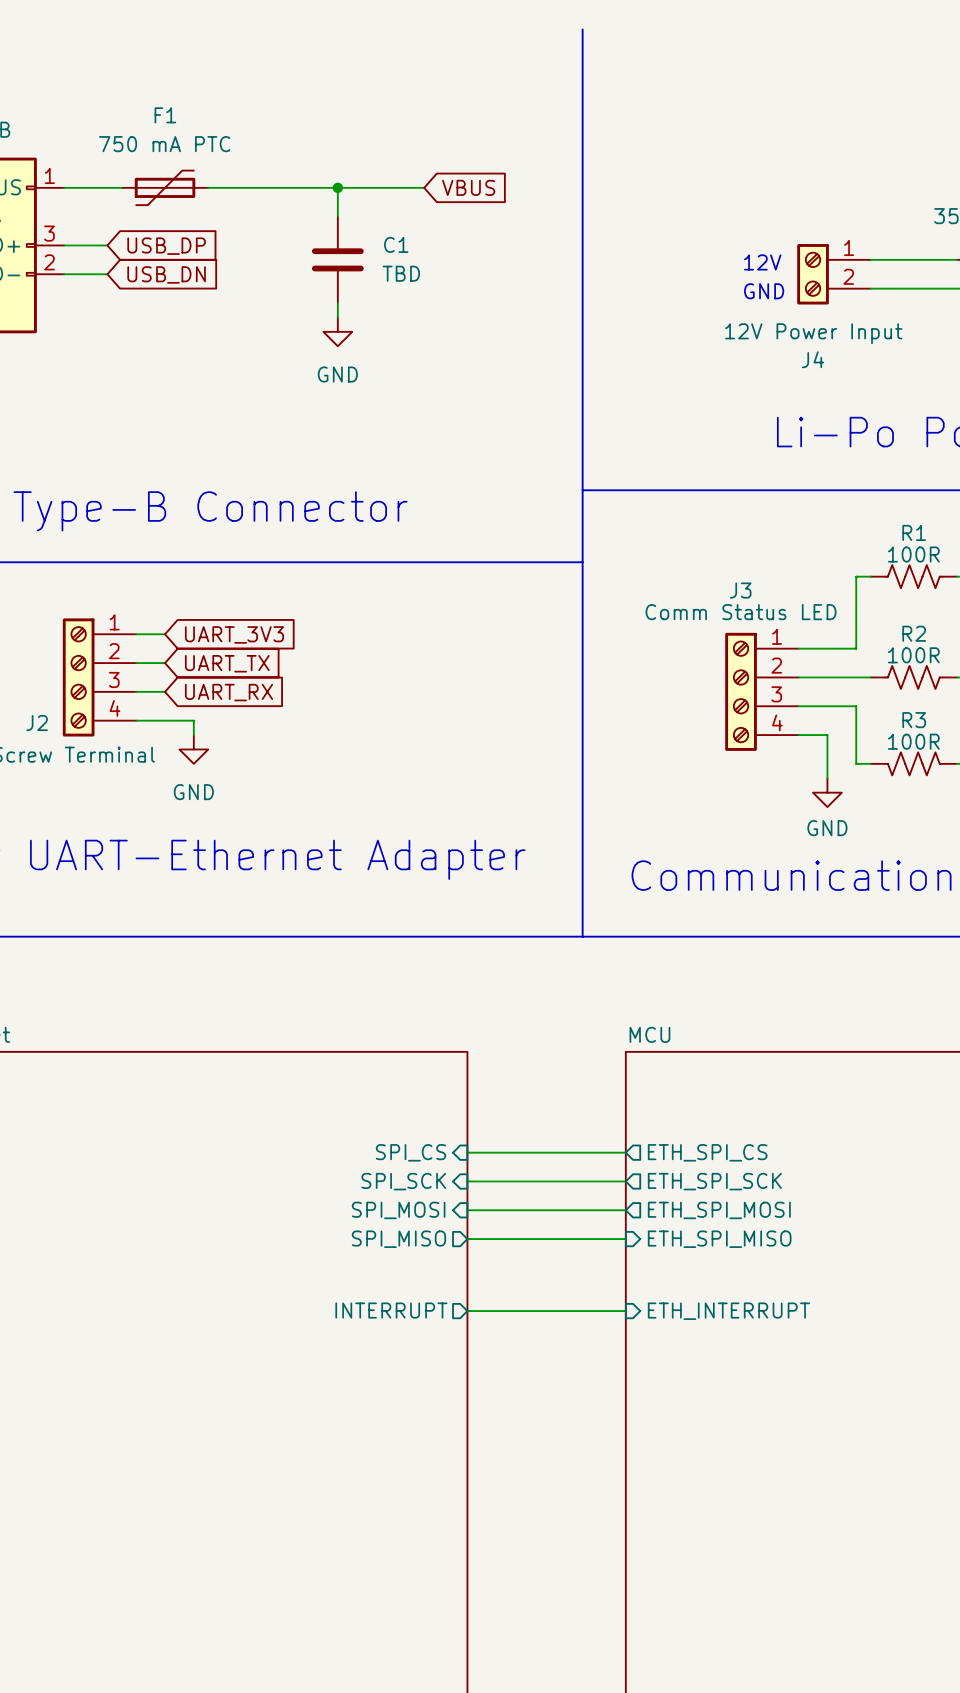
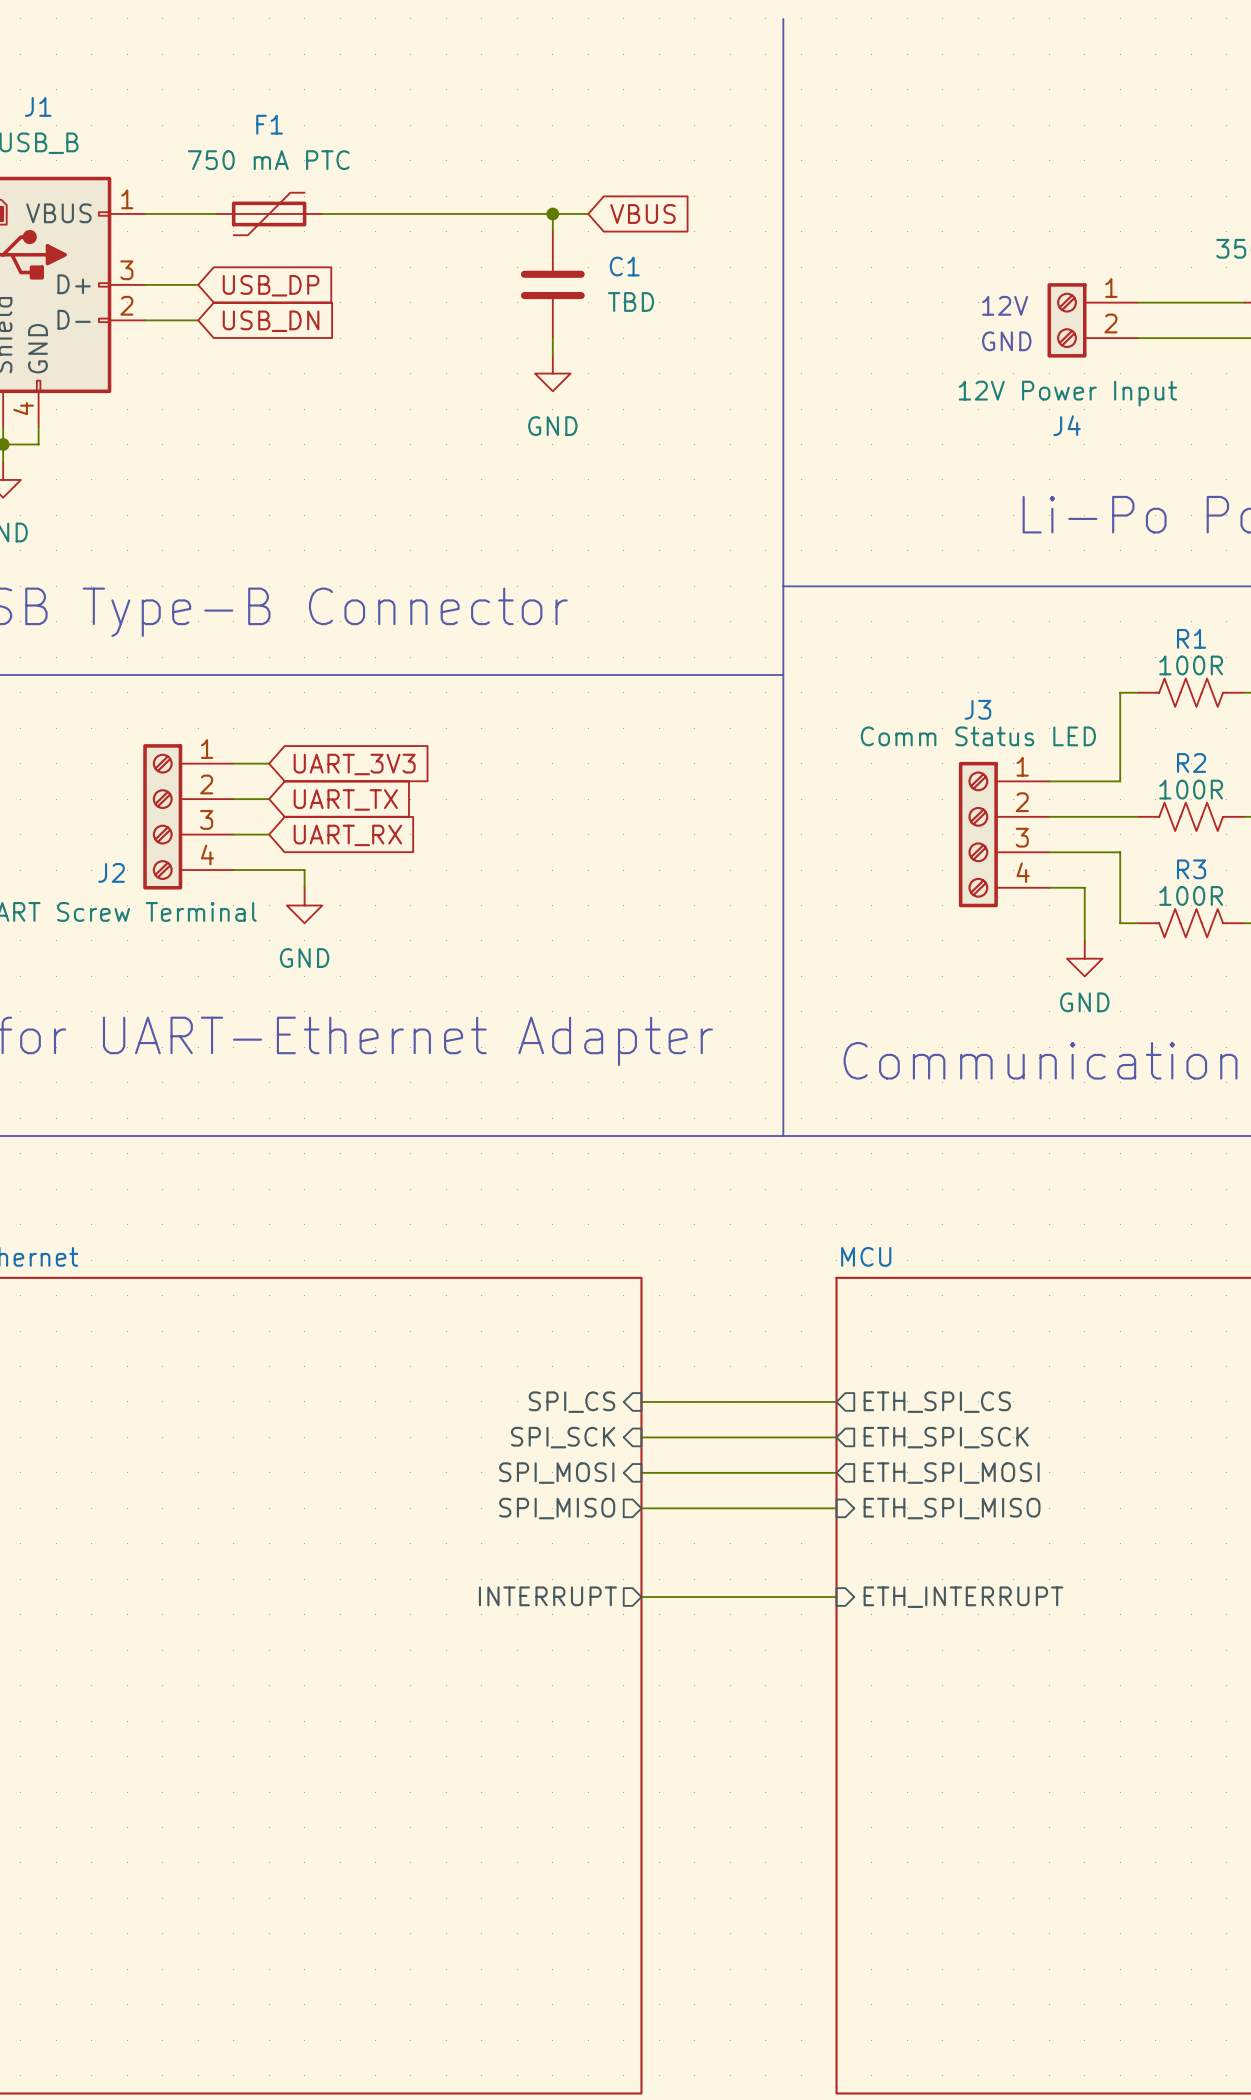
wire: (337, 187) (337, 216) -> none
junction position: (337, 187) -> (552, 213)
wire: none -> (552, 213) (552, 231)
C1 position: (337, 259) -> (552, 284)
wire: (337, 303) (337, 317) -> (552, 338) (552, 355)
power symbol position: GND (337, 331) -> GND (552, 373)

